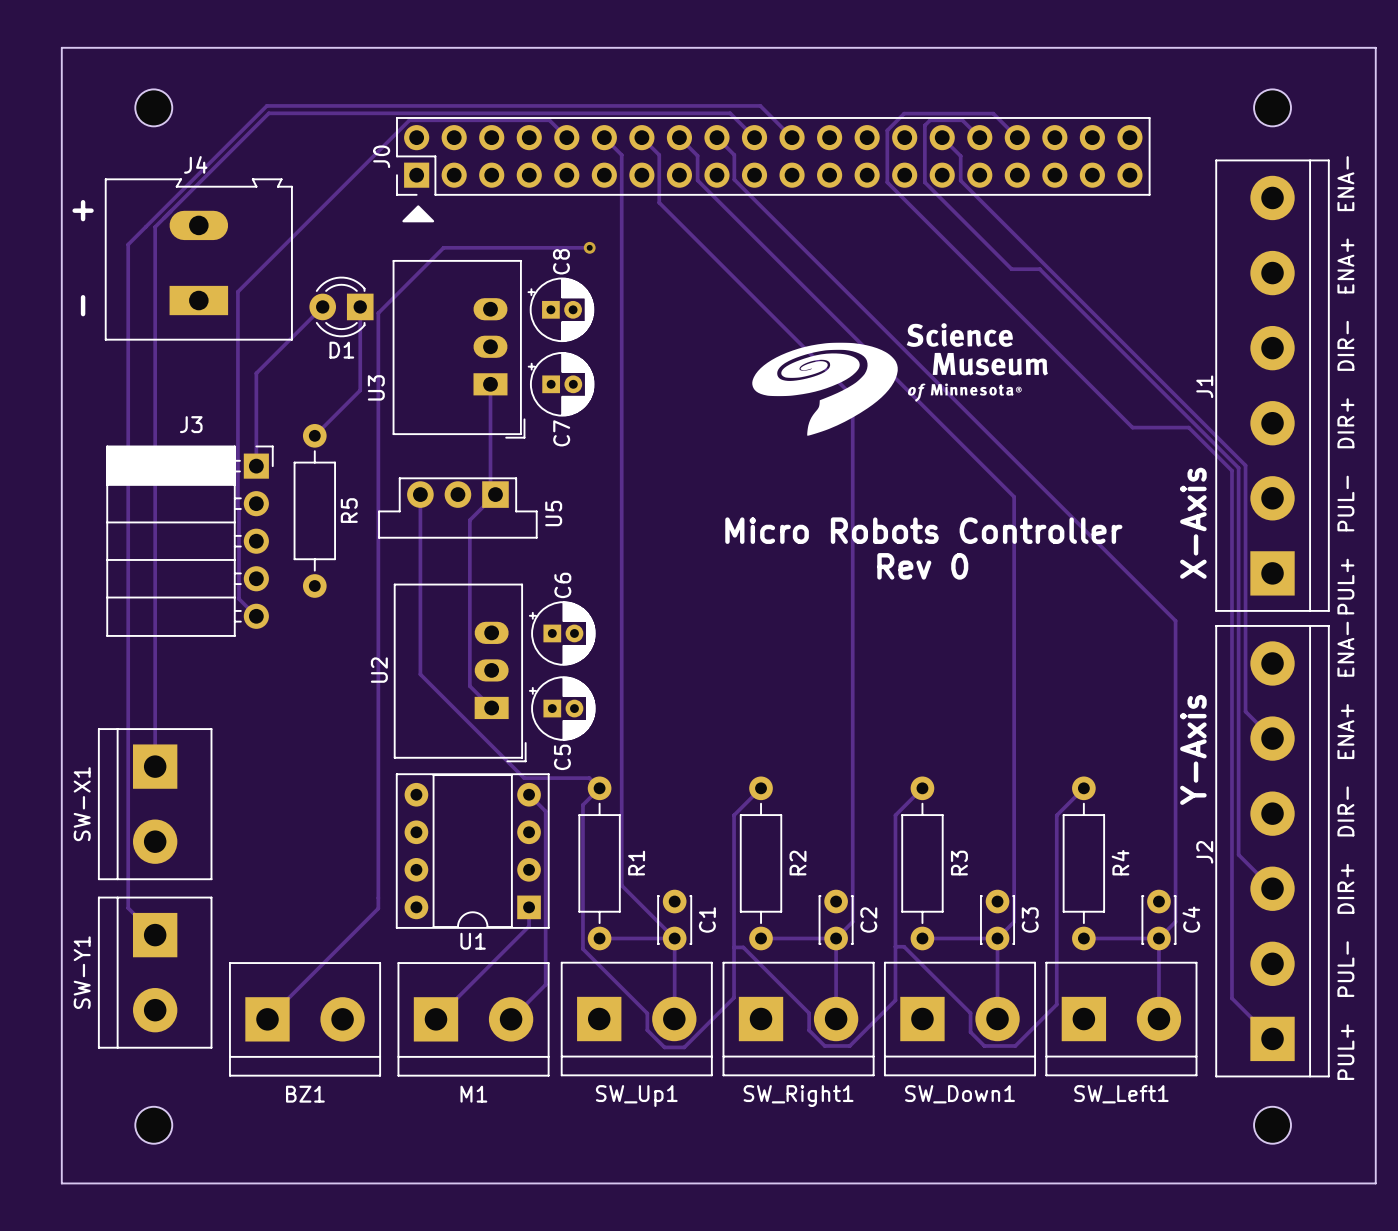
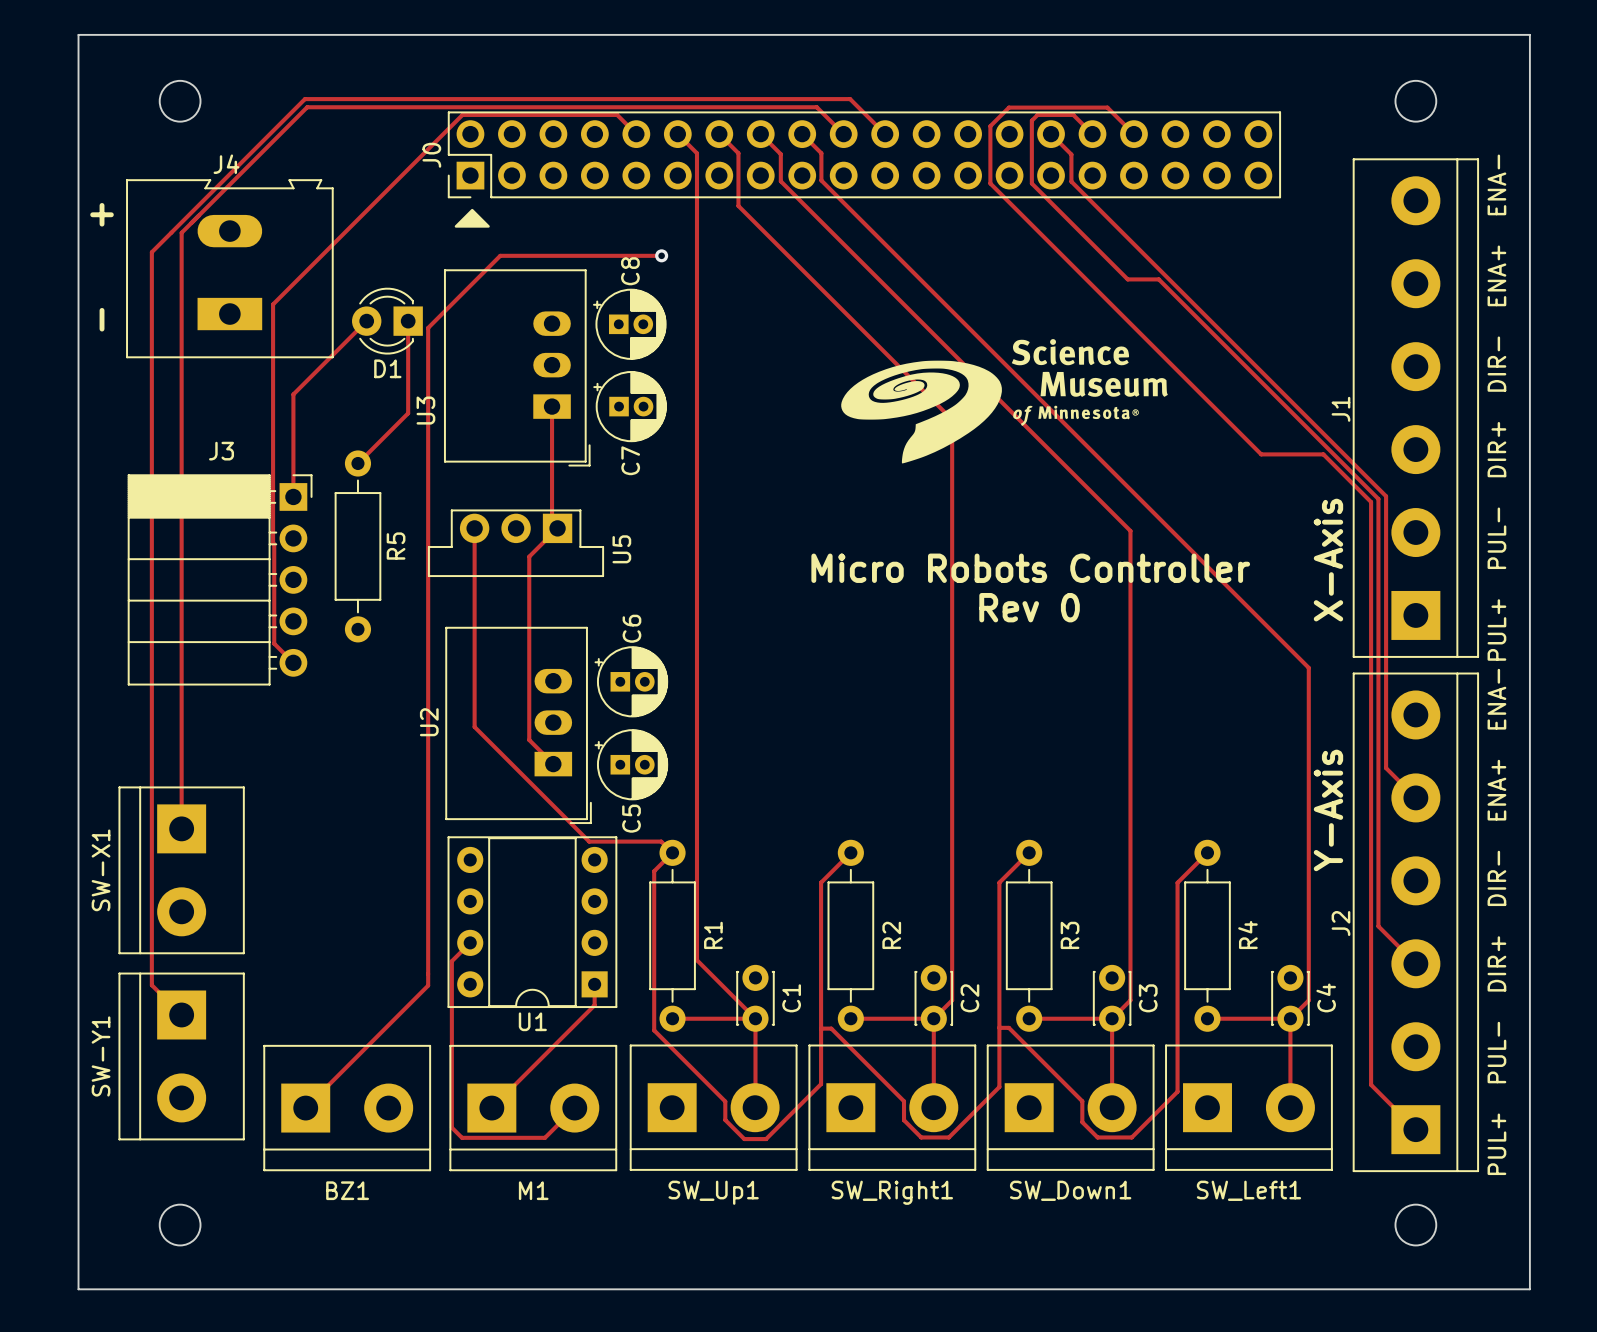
track: (529, 794) (545, 811) (545, 984) (511, 1019) -> (470, 942) (451, 961) (451, 1127) (462, 1137) (544, 1137) (574, 1108)

